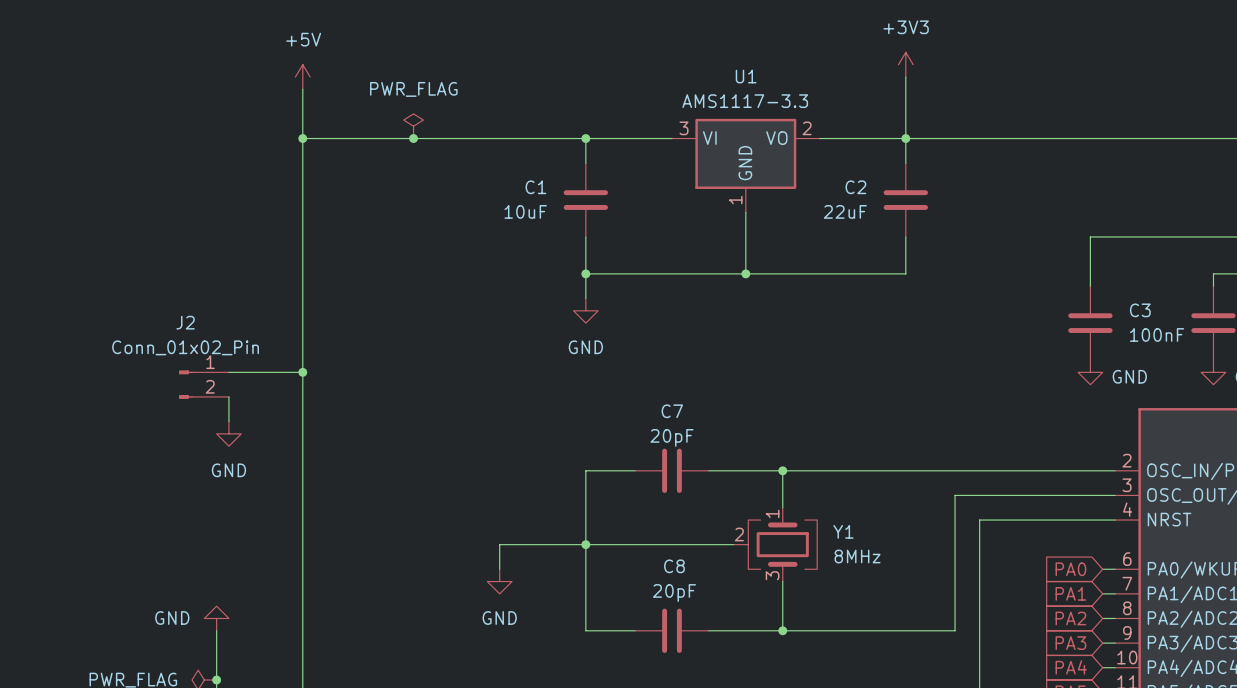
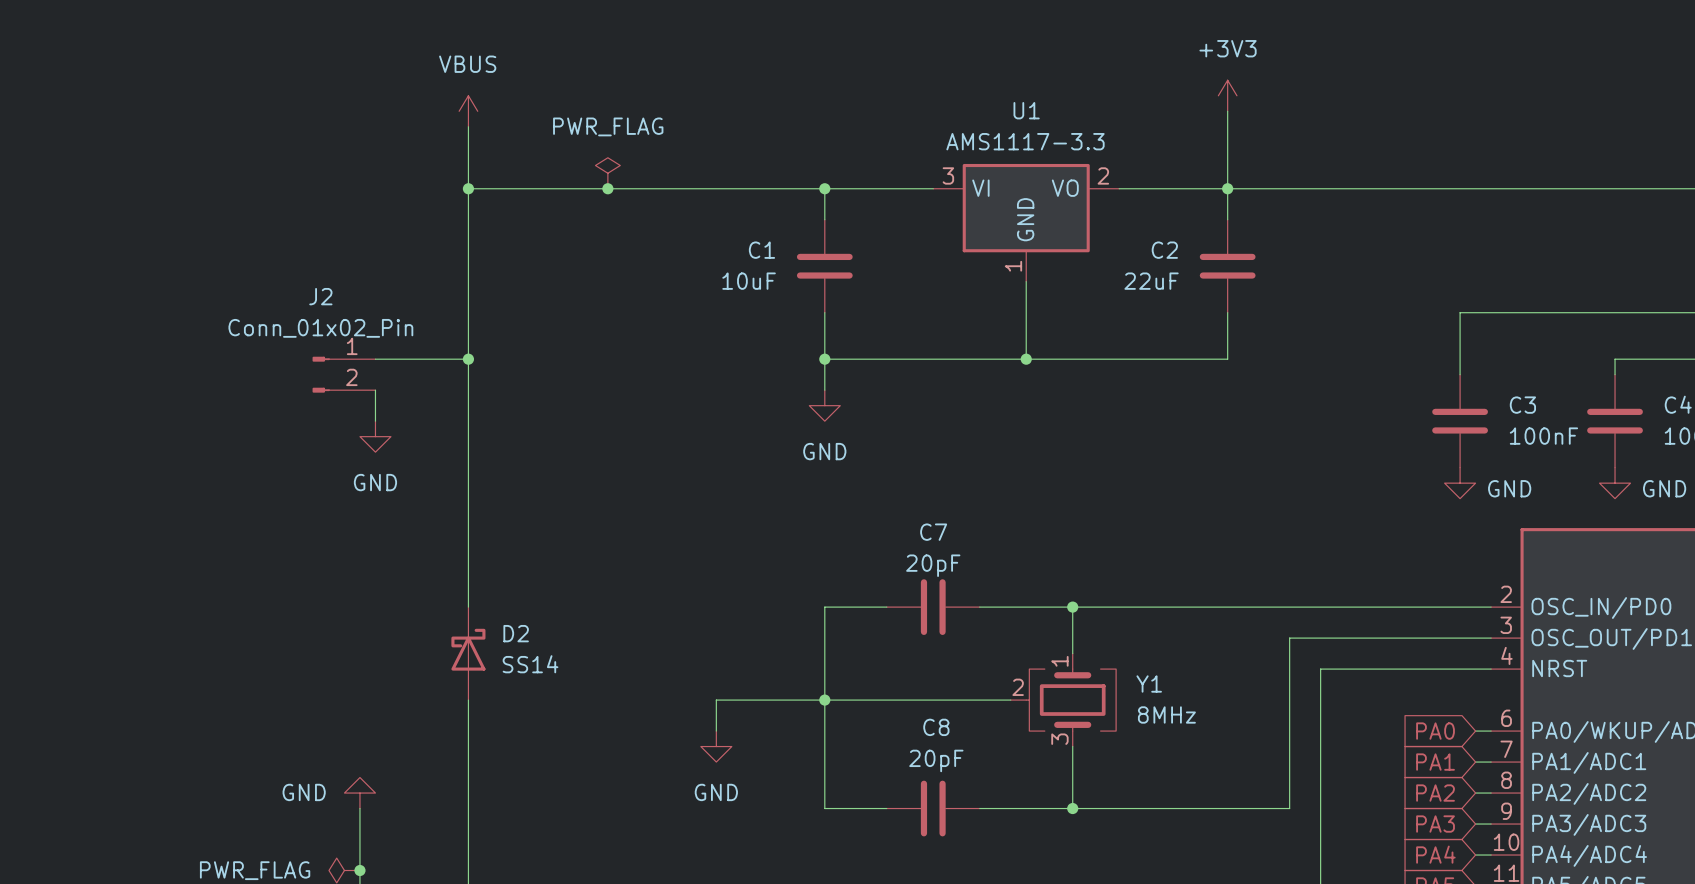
power symbol: +5V (302, 76) -> VBUS (468, 111)
junction: none -> (468, 359)
wire: (228, 372) (302, 372) -> (375, 359) (468, 359)
junction: (302, 372) -> none
J2 position: (203, 384) -> (344, 374)
wire: (228, 396) (228, 421) -> (375, 390) (375, 421)
power symbol position: GND (228, 433) -> GND (375, 436)
D2: none -> SS14 (468, 653)

